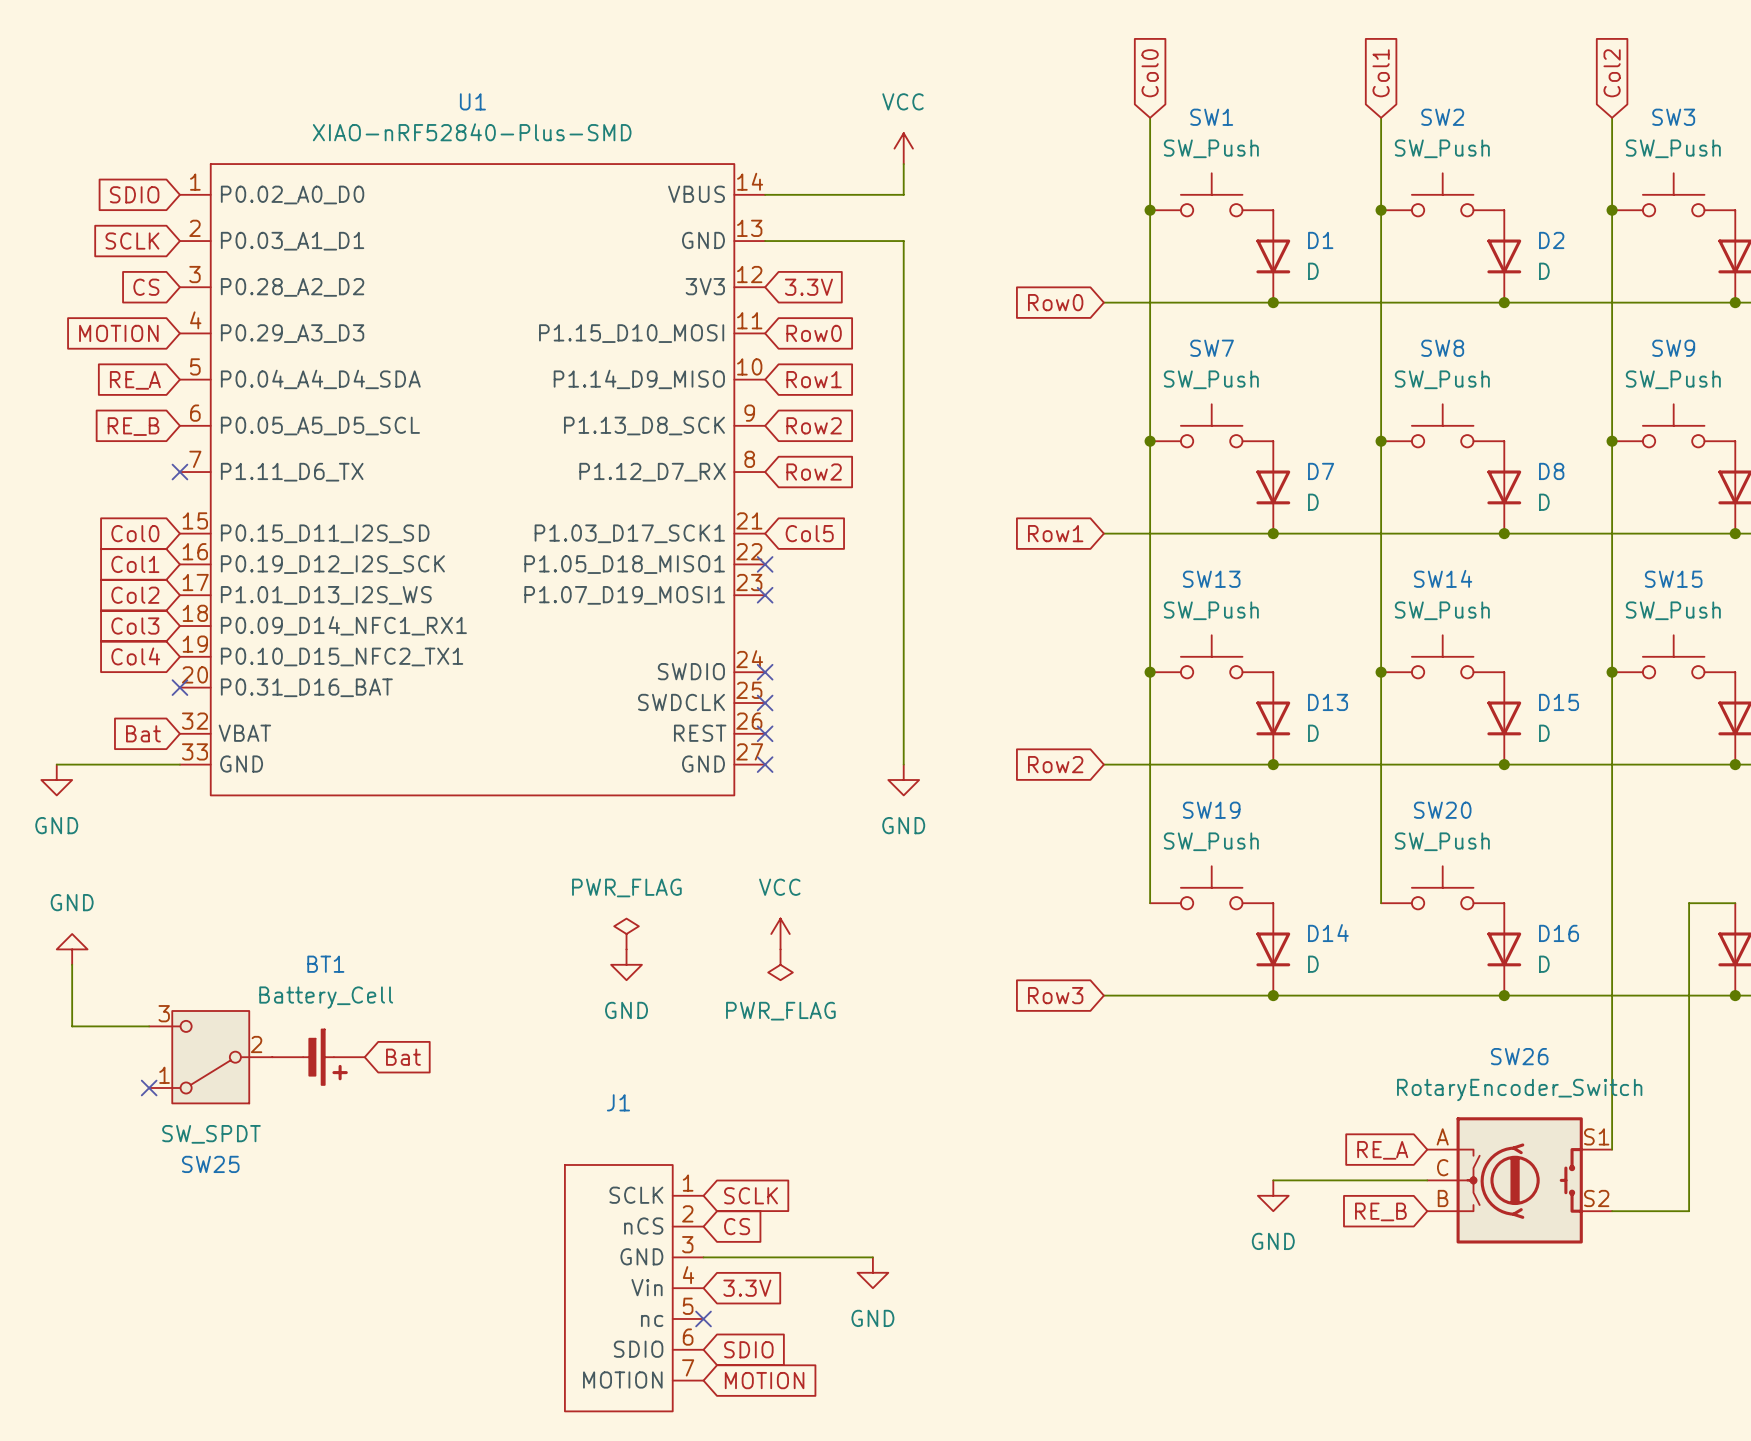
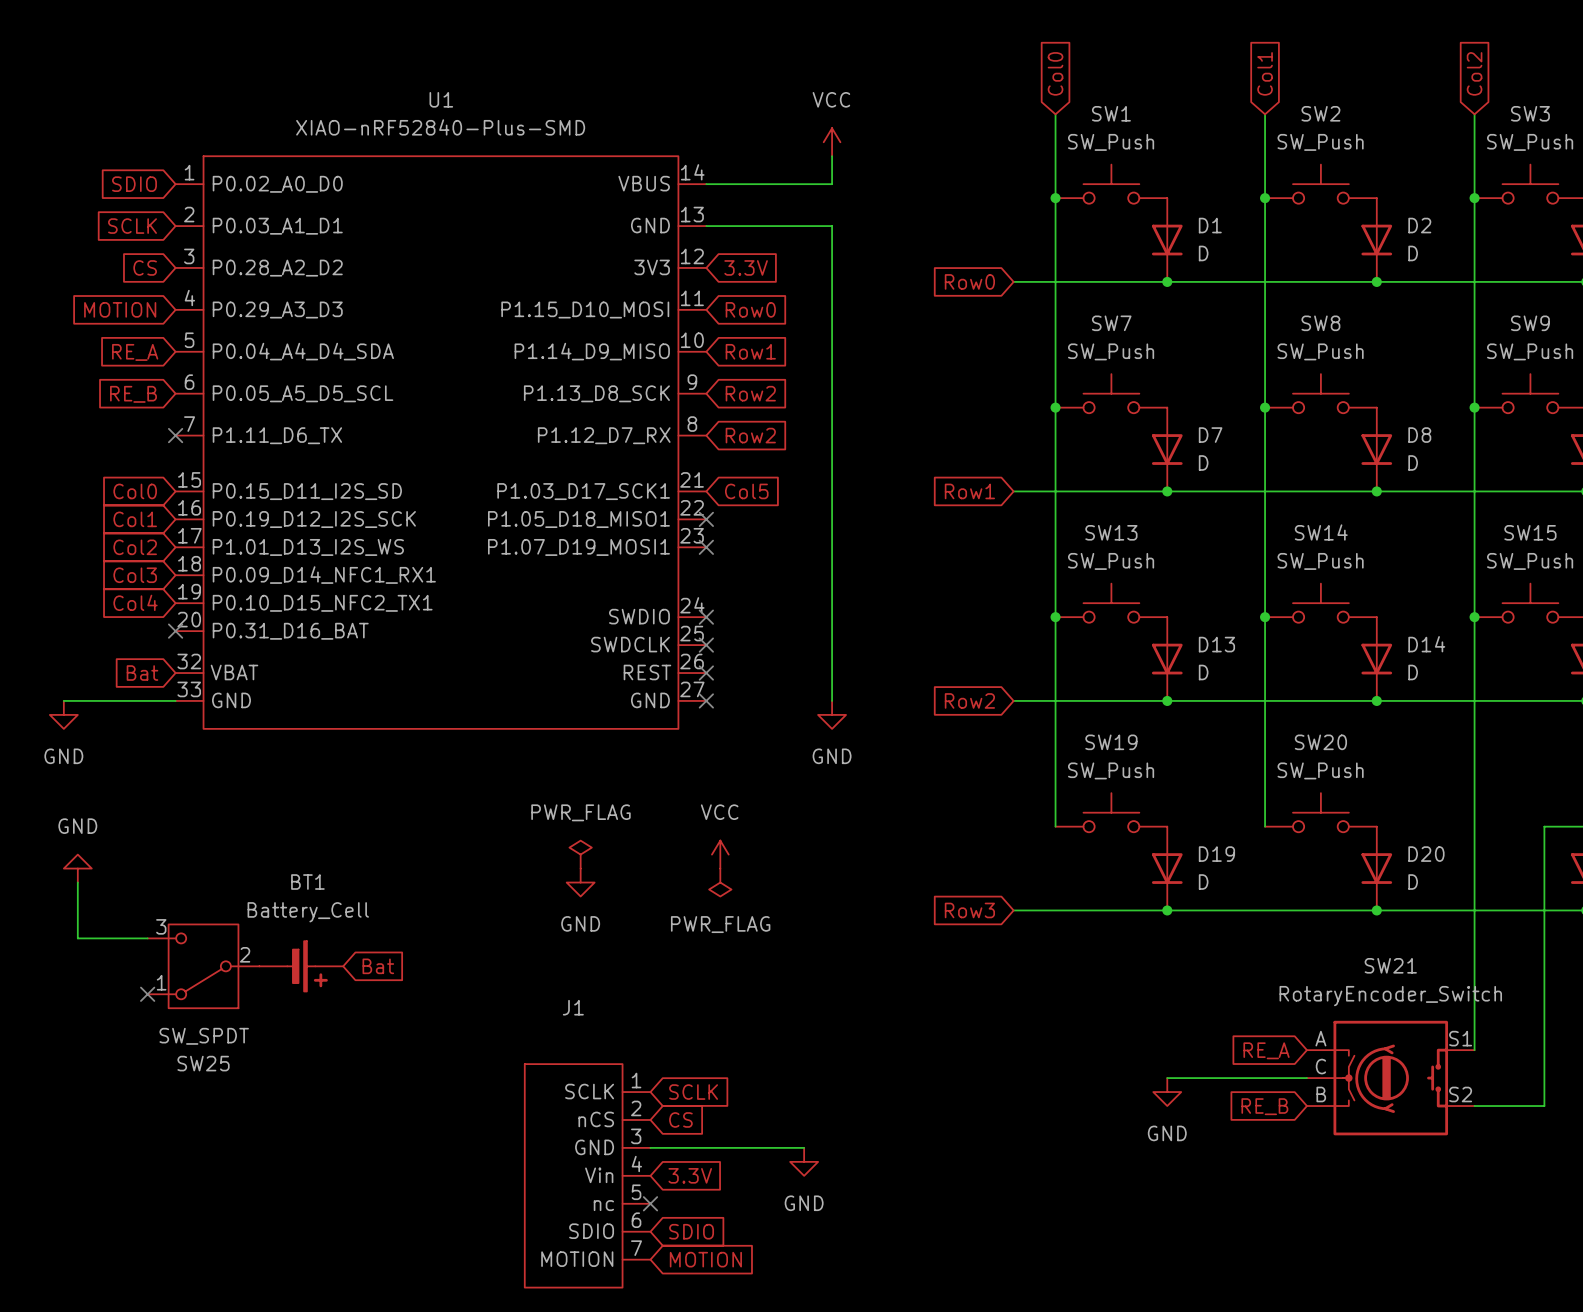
D15 name: D15 (1559, 702) -> D14 (1426, 644)
D14 name: D14 (1328, 933) -> D19 (1216, 854)
D16 name: D16 (1559, 933) -> D20 (1426, 854)
SW26 name: SW26 (1519, 1056) -> SW21 (1390, 965)

